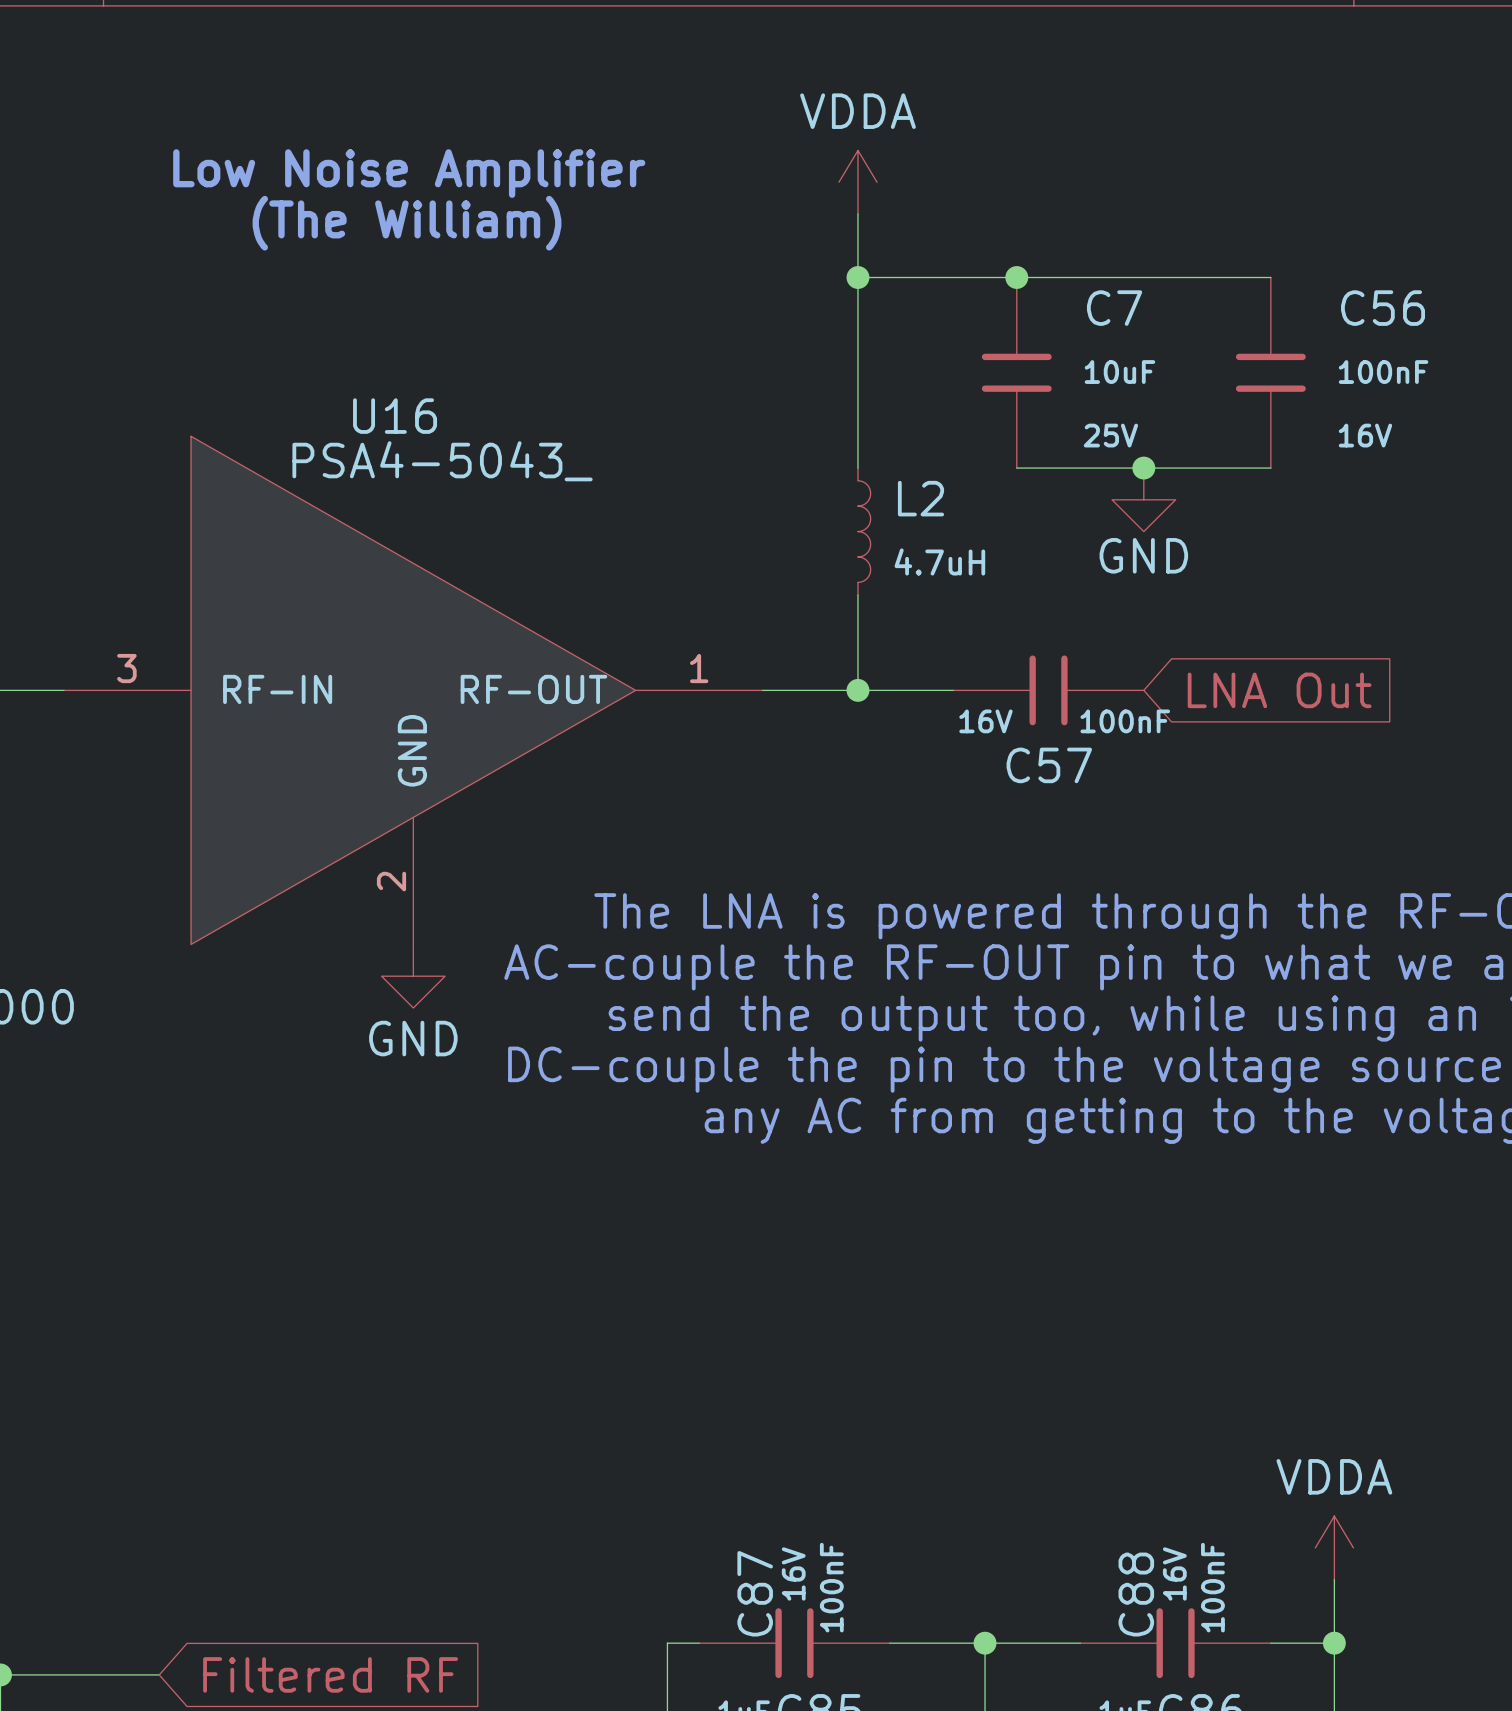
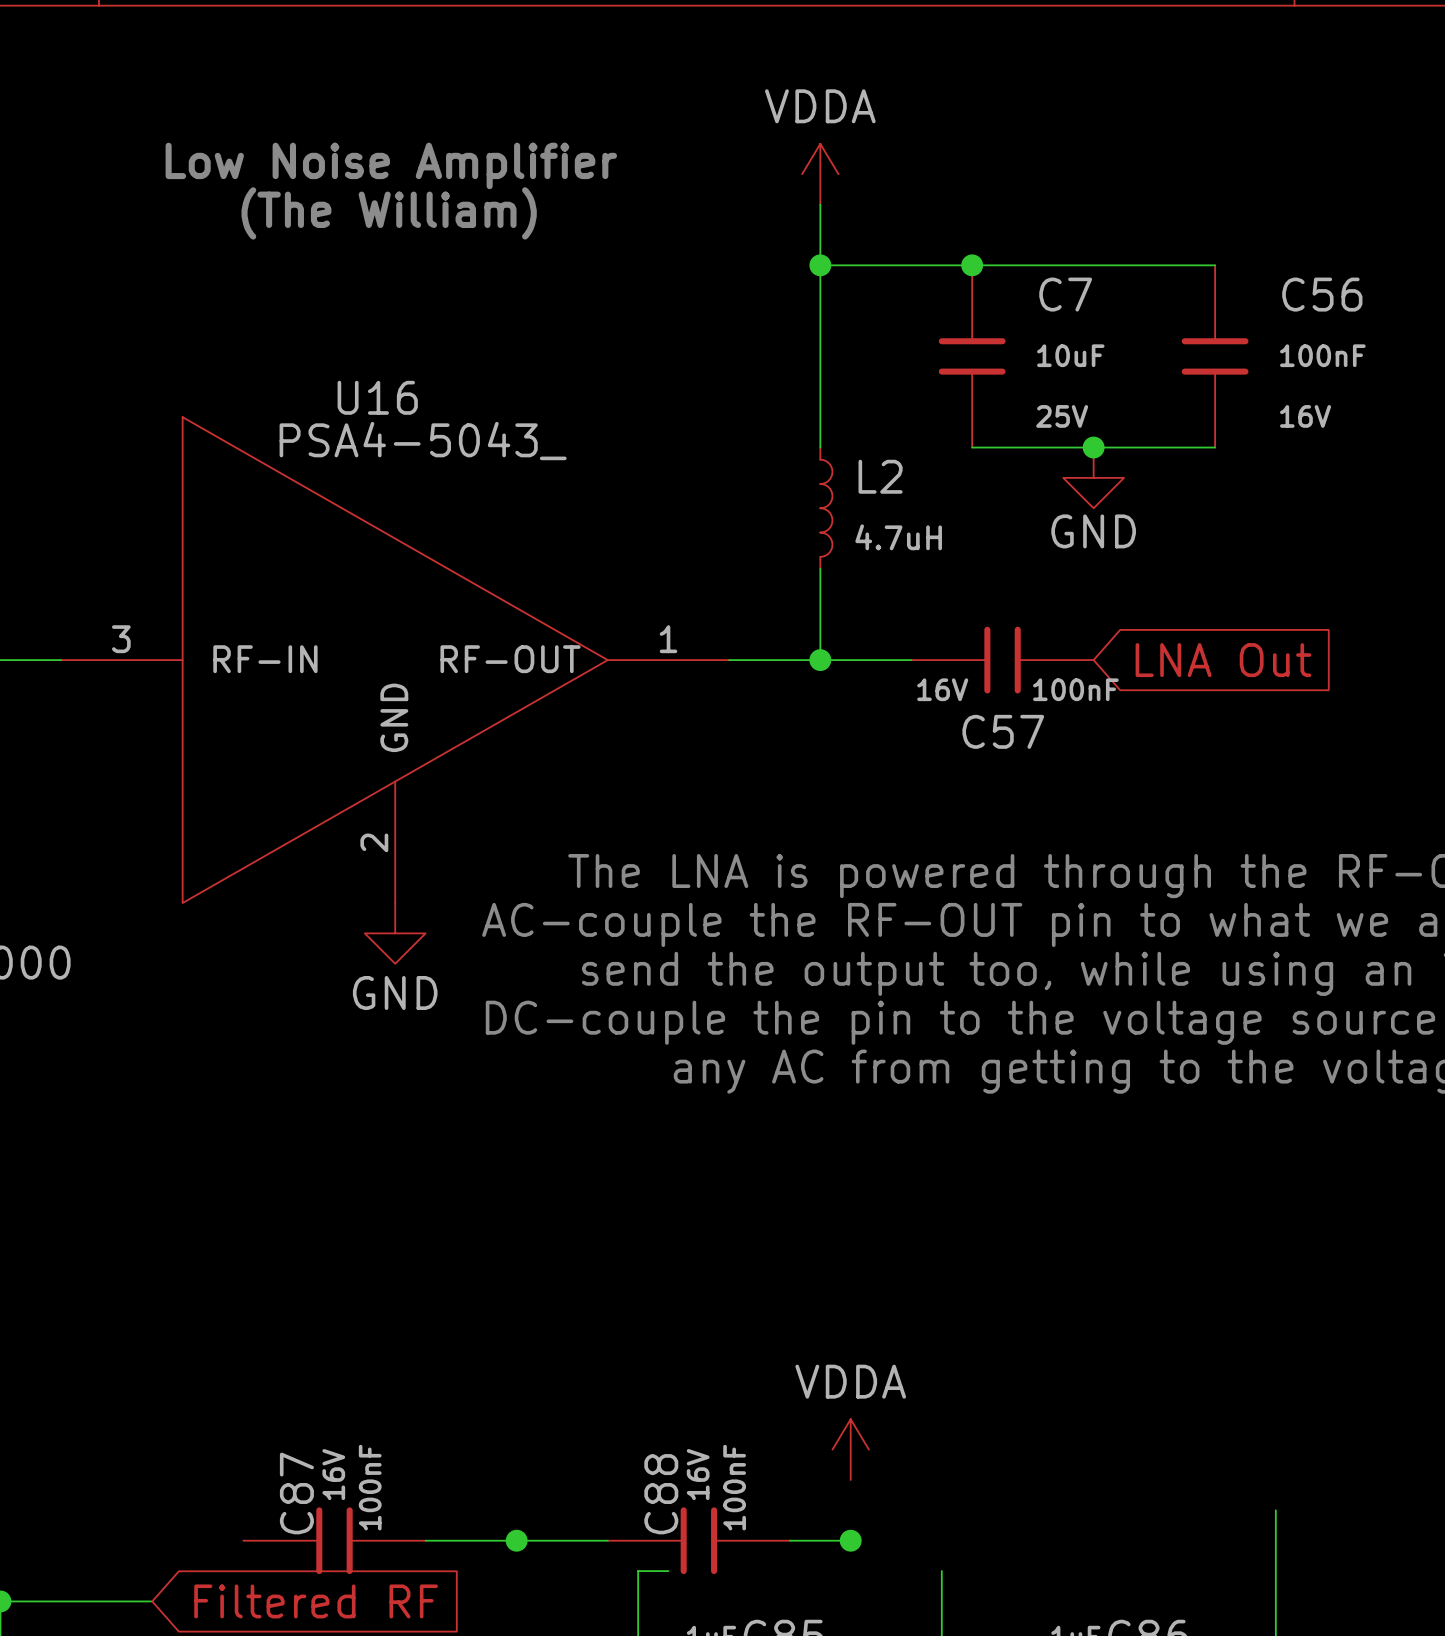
power symbol position: VDDA (1334, 1547) -> VDDA (850, 1449)
junction: none -> (516, 1540)
junction: none -> (850, 1540)
C87 position: (794, 1643) -> (334, 1540)
wire: (889, 1643) (1080, 1643) -> (425, 1540) (607, 1540)
junction: (985, 1643) -> none
C88 position: (1175, 1643) -> (698, 1540)
wire: (1270, 1643) (1334, 1643) -> (789, 1540) (850, 1540)
junction: (1334, 1643) -> none

